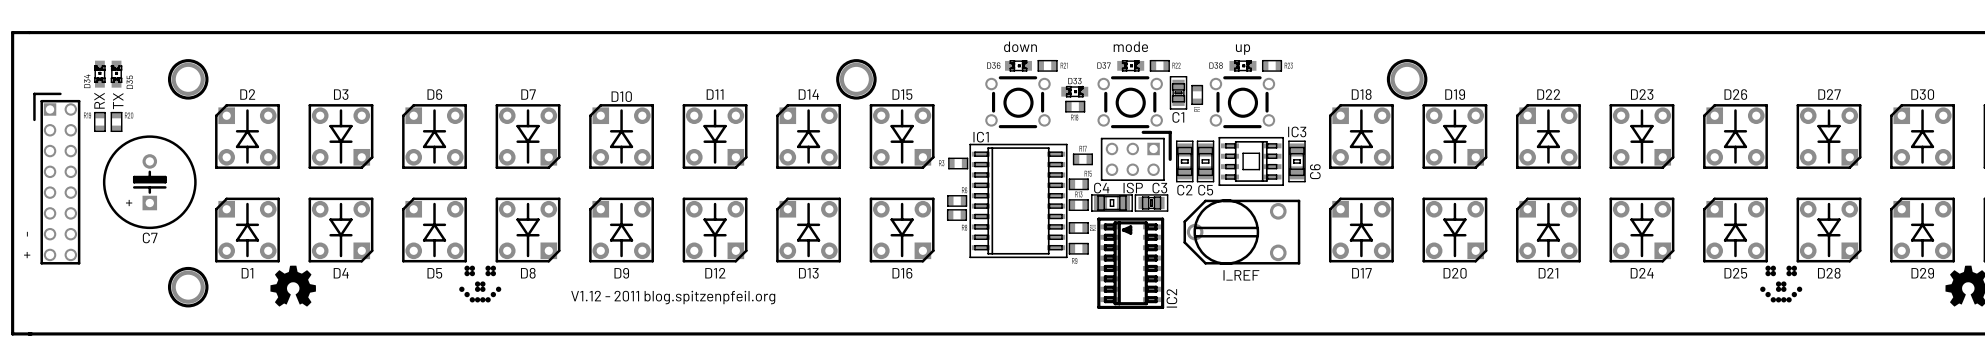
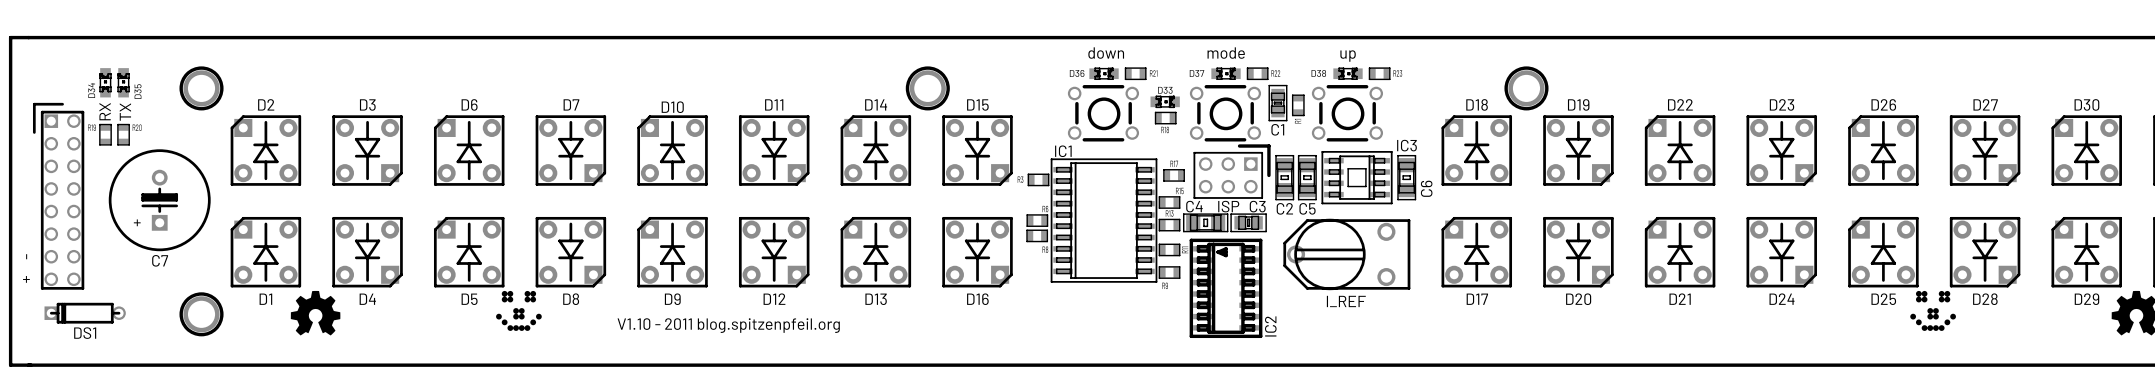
DS1: none -> (85, 313)
text: V1.12 - 2011 blog.spitzenpfeil.org (673, 297) -> V1.10 - 2011 blog.spitzenpfeil.org (728, 325)

